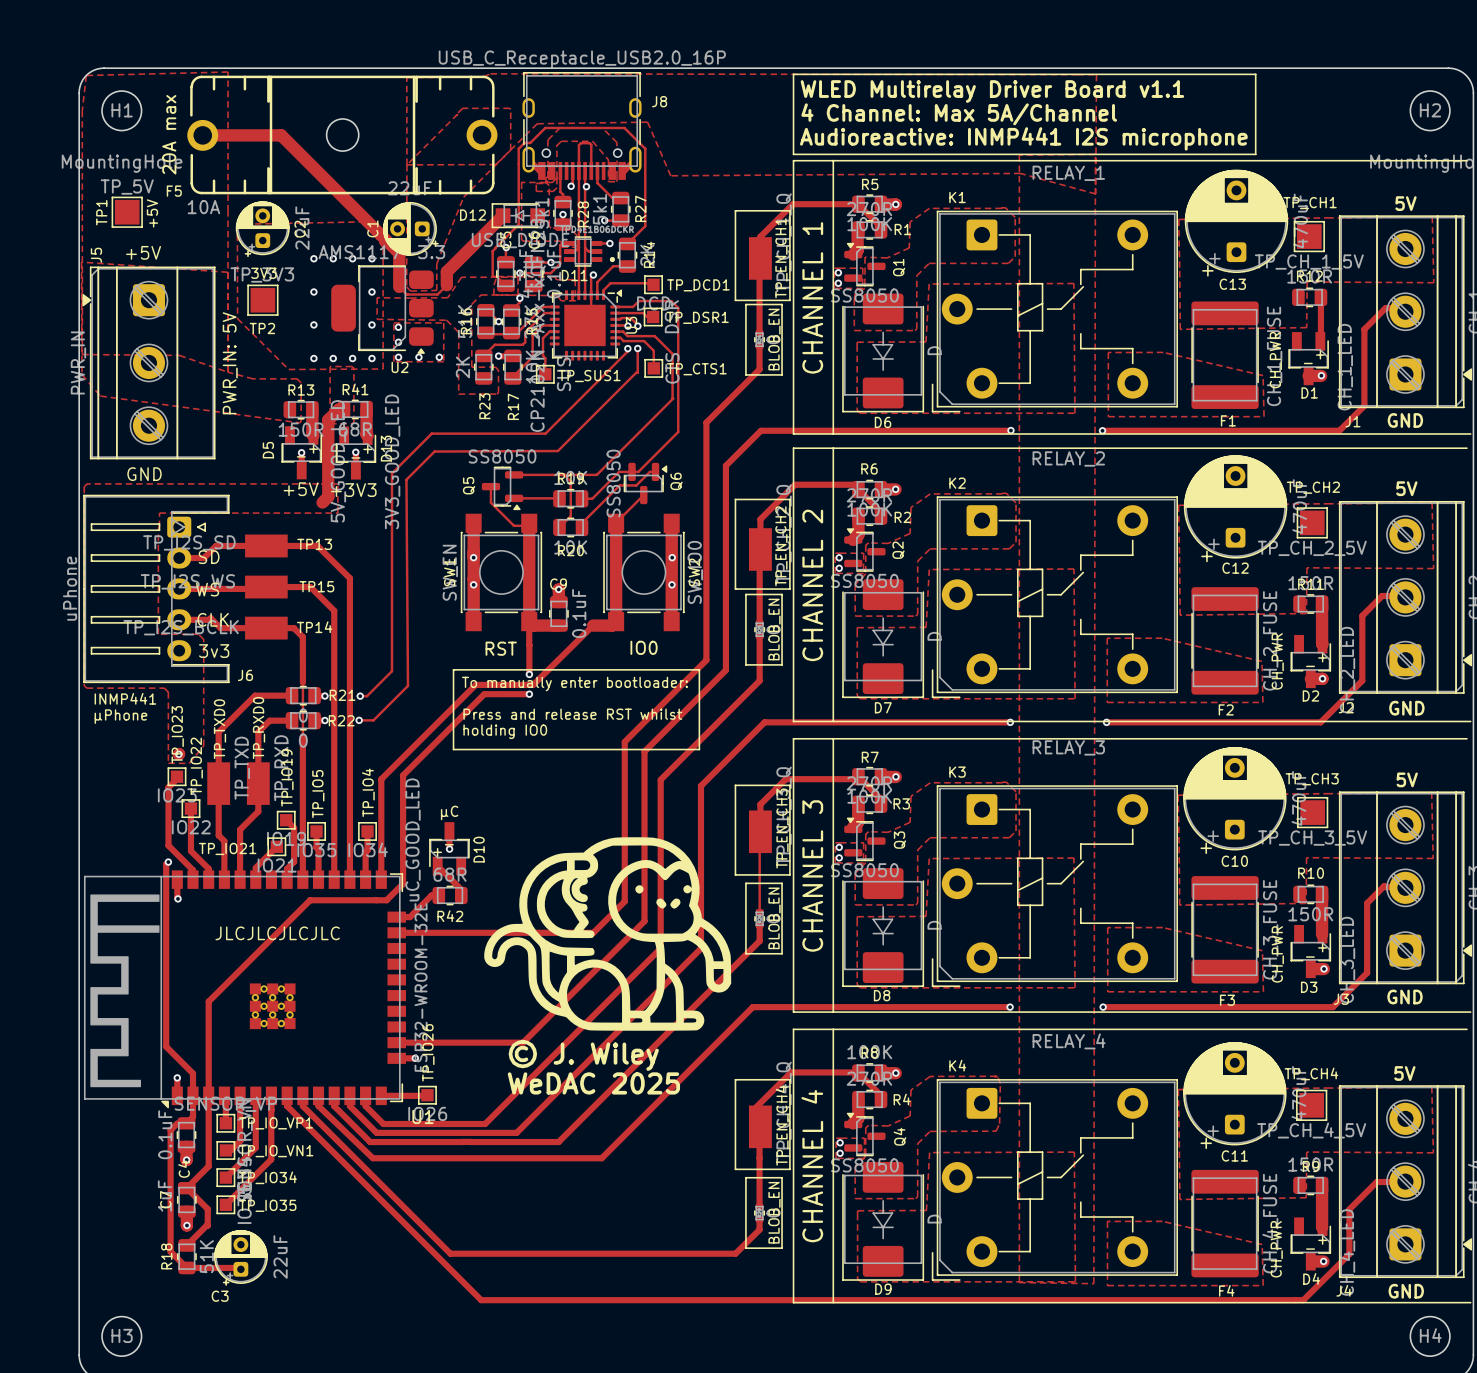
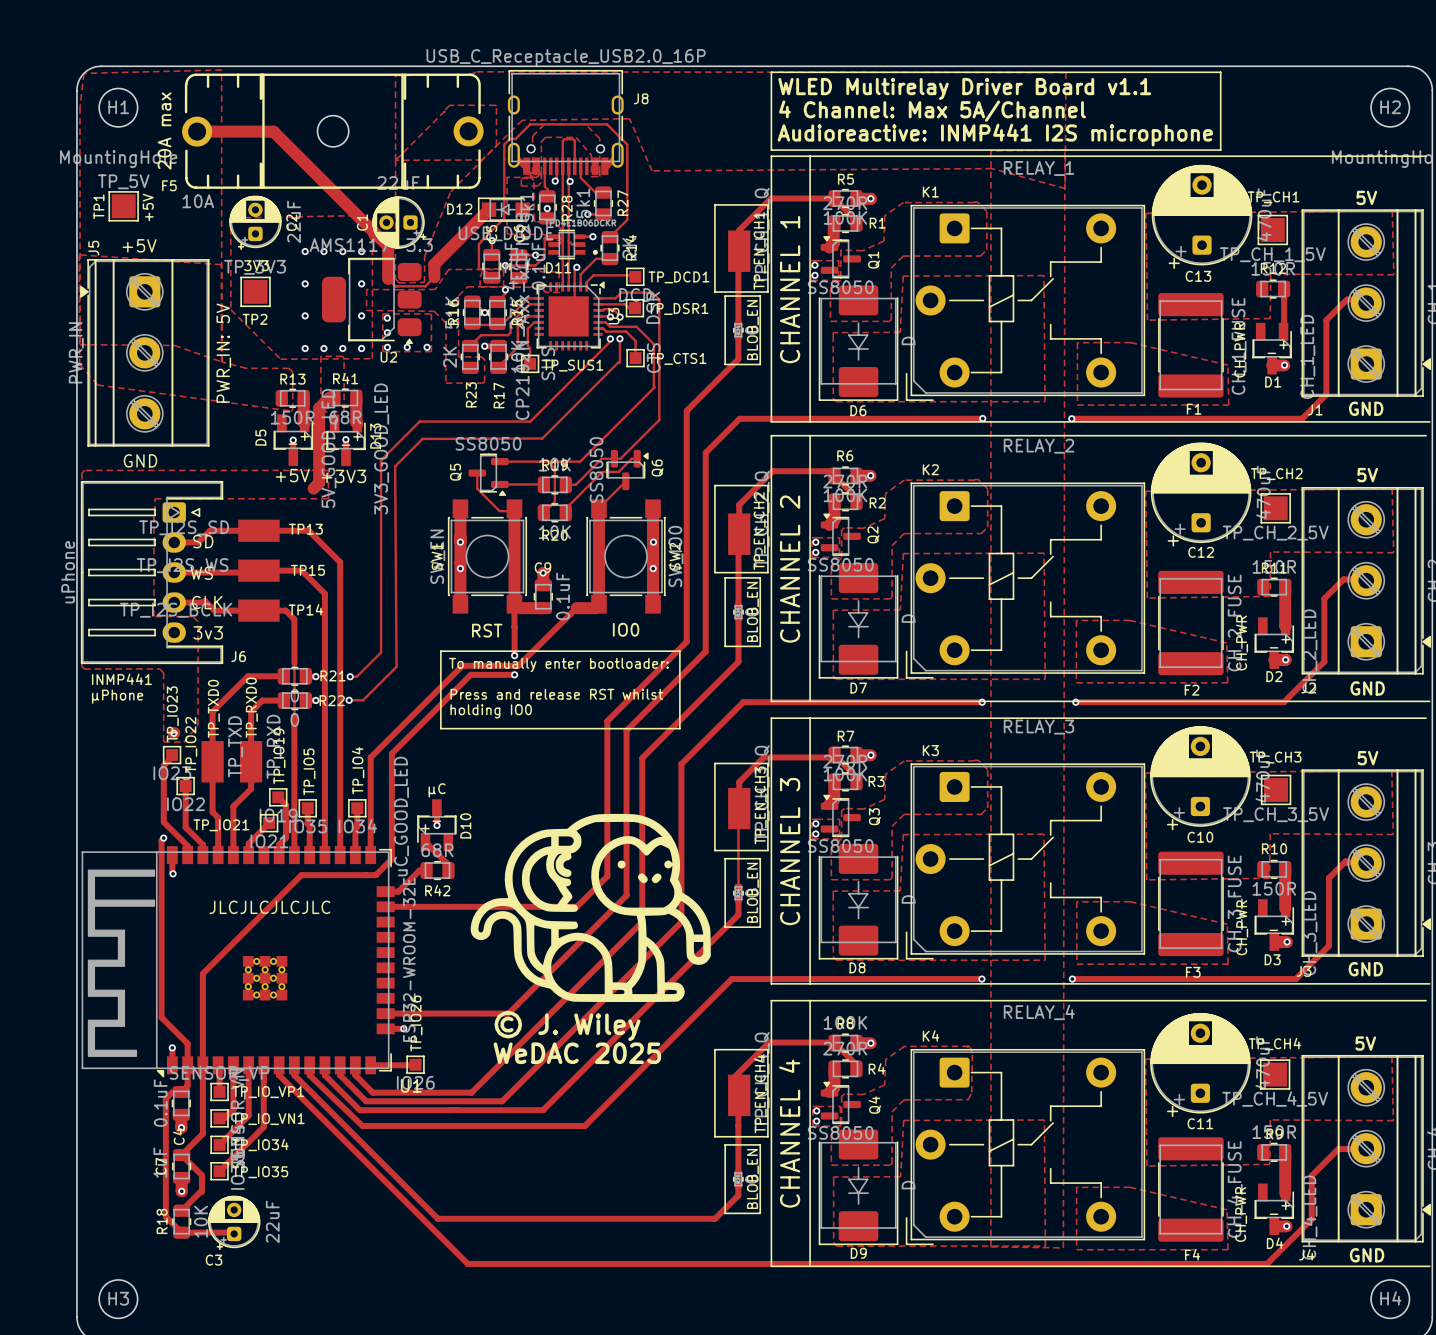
R18 value: 51K (206, 1256) -> 10K (201, 1221)

